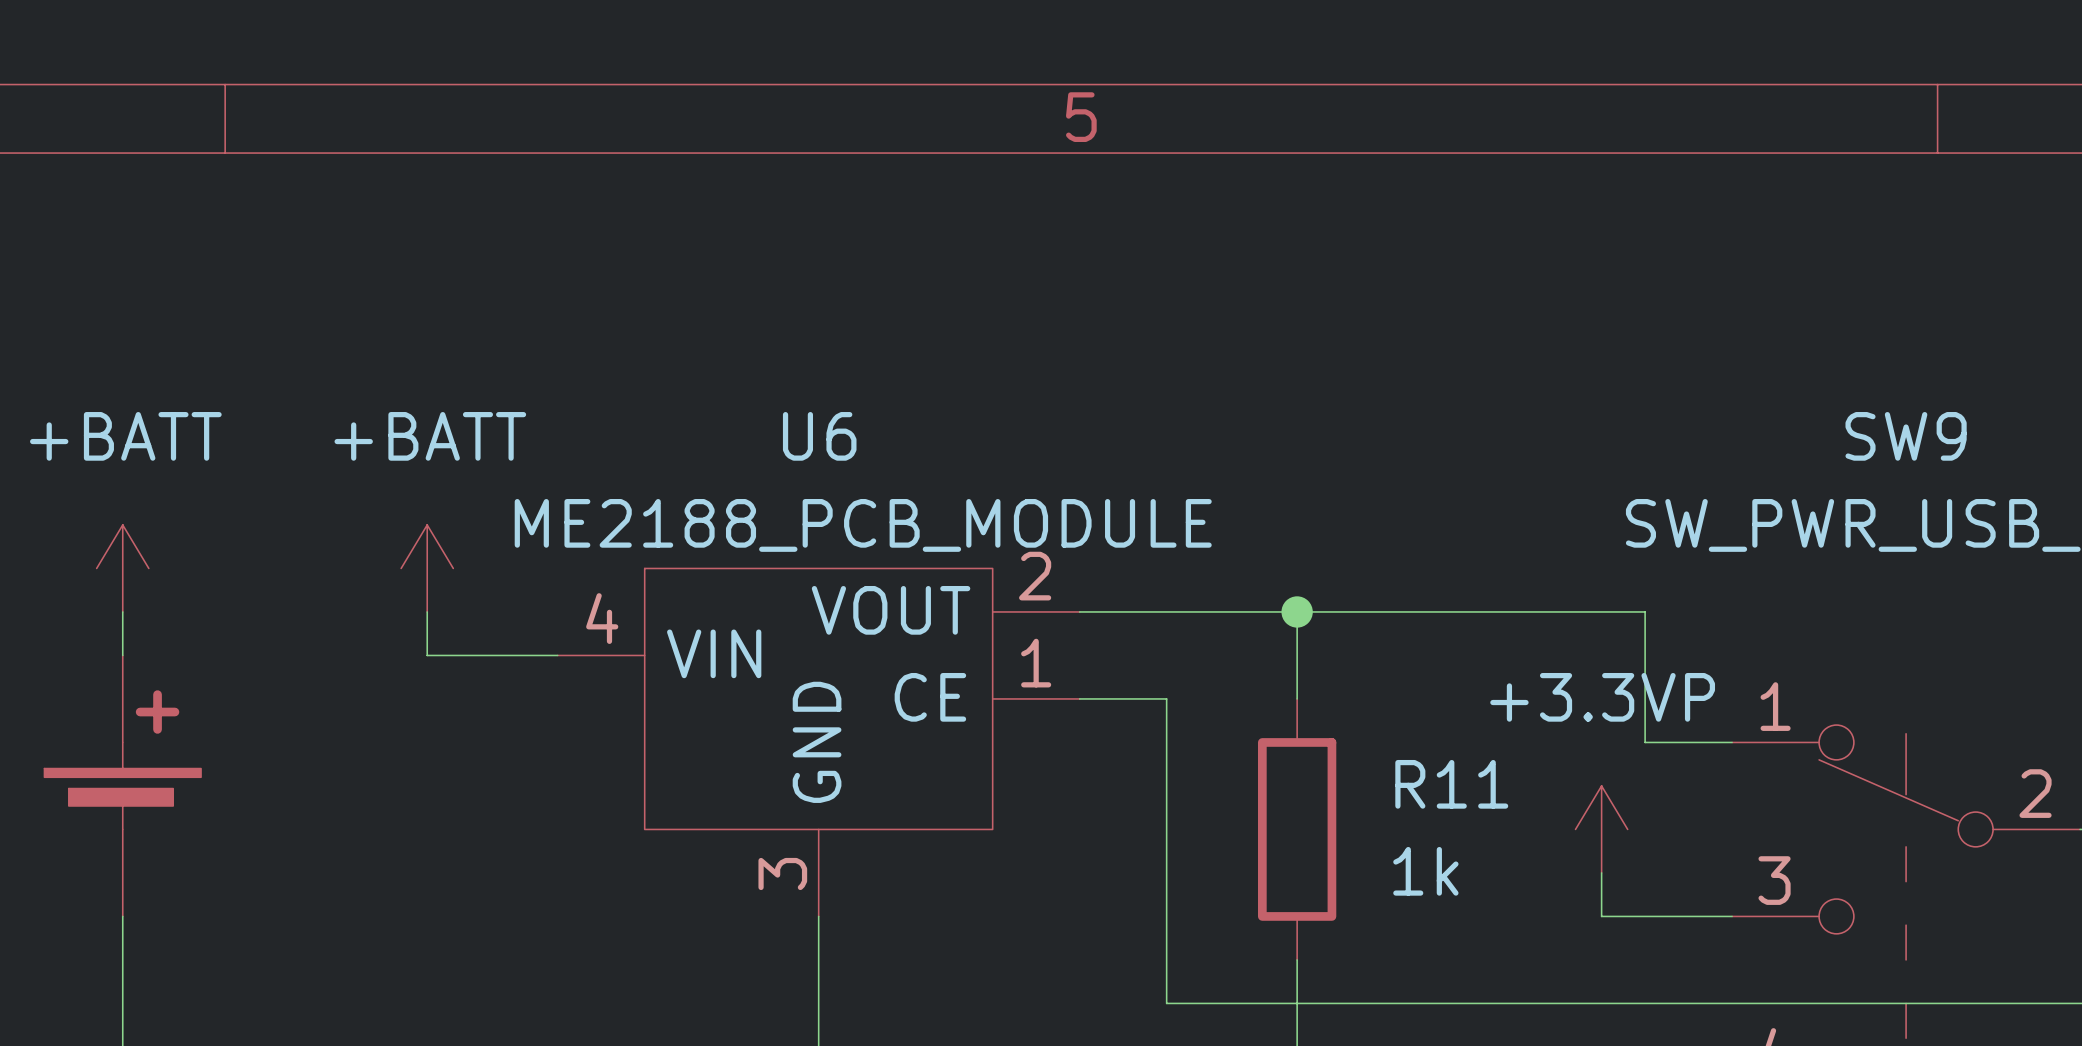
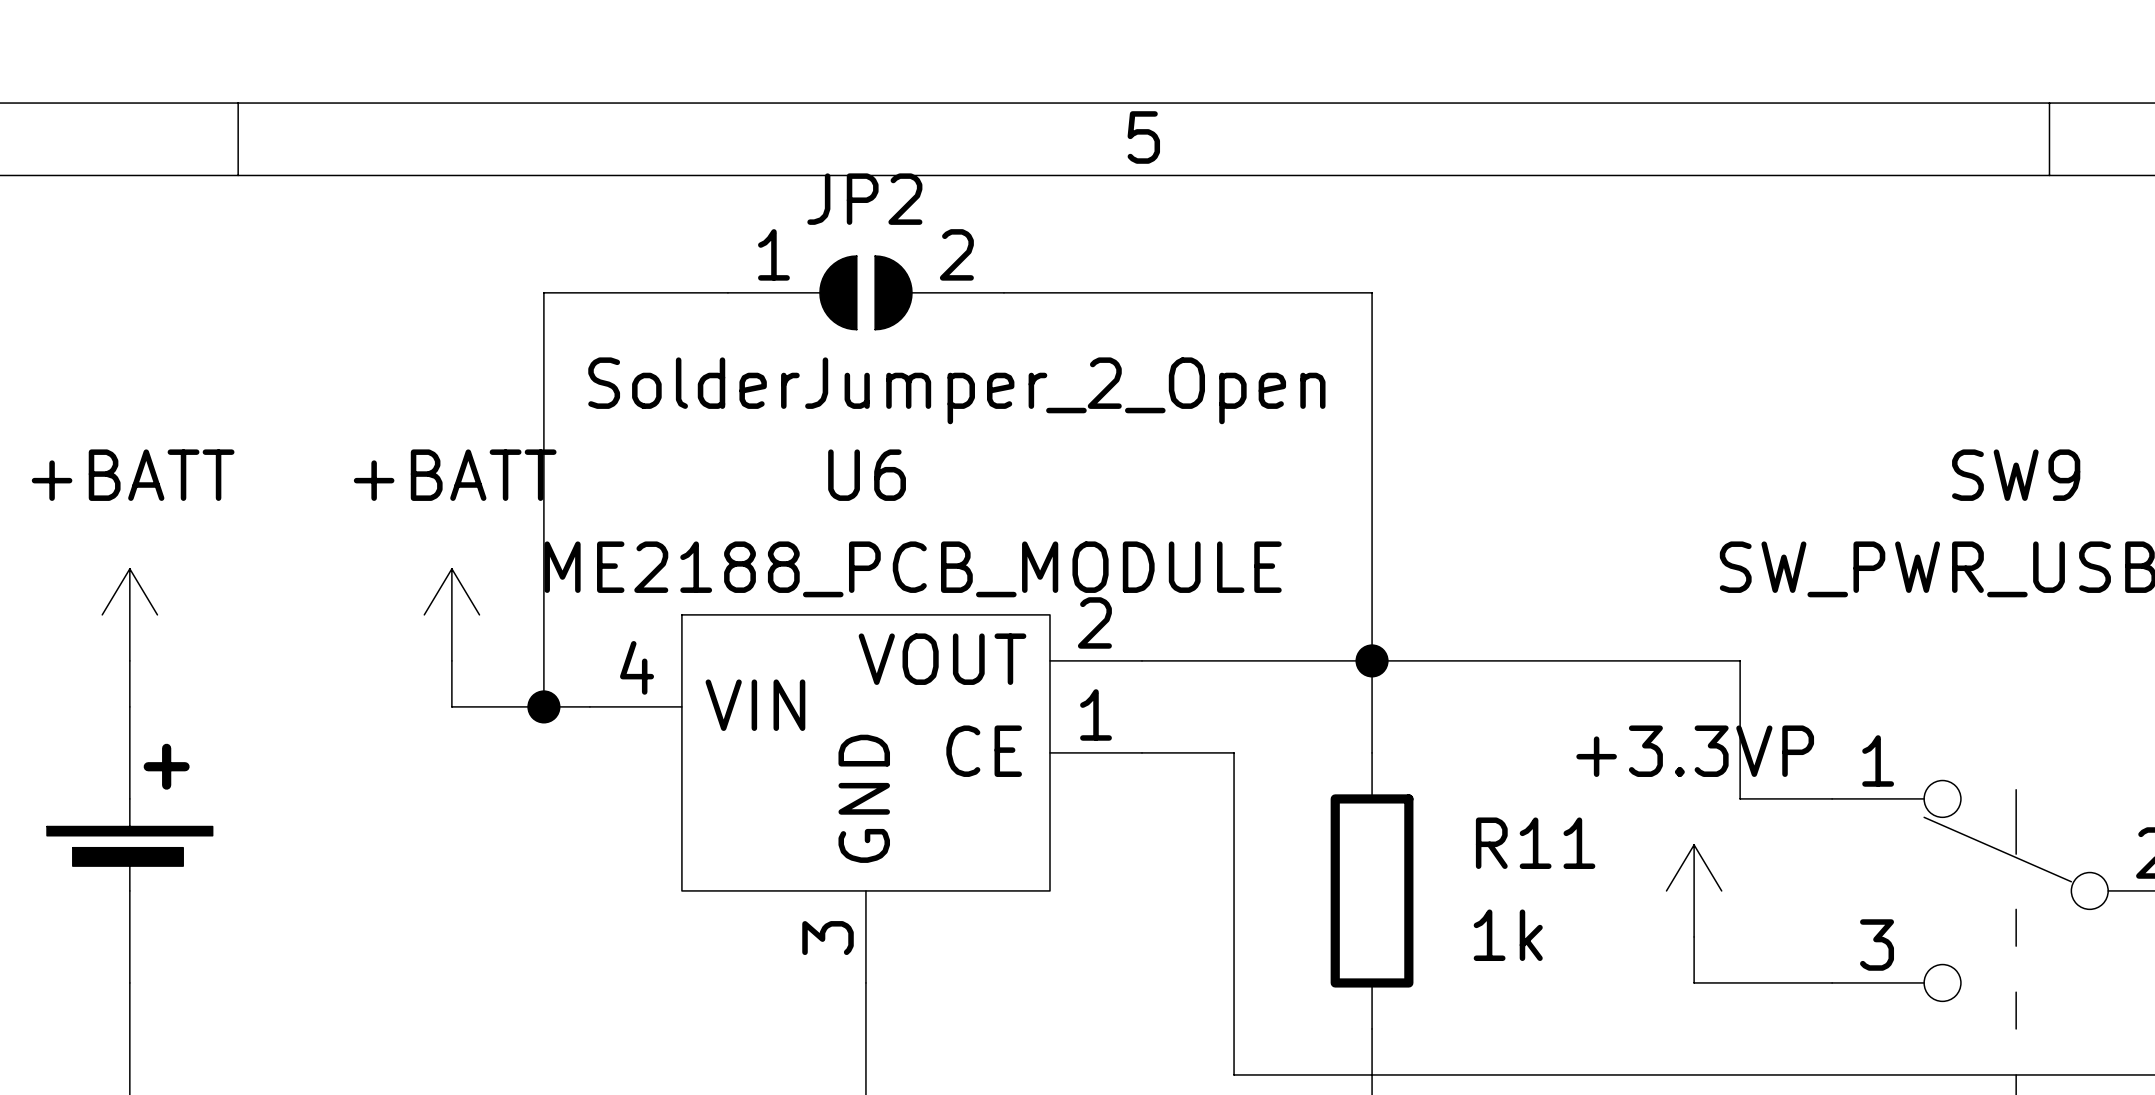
wire: none -> (727, 292) (543, 292) (543, 706)
JP2: none -> SolderJumper_2_Open (865, 292)
wire: none -> (1003, 292) (1372, 292) (1372, 660)
junction: none -> (543, 706)

